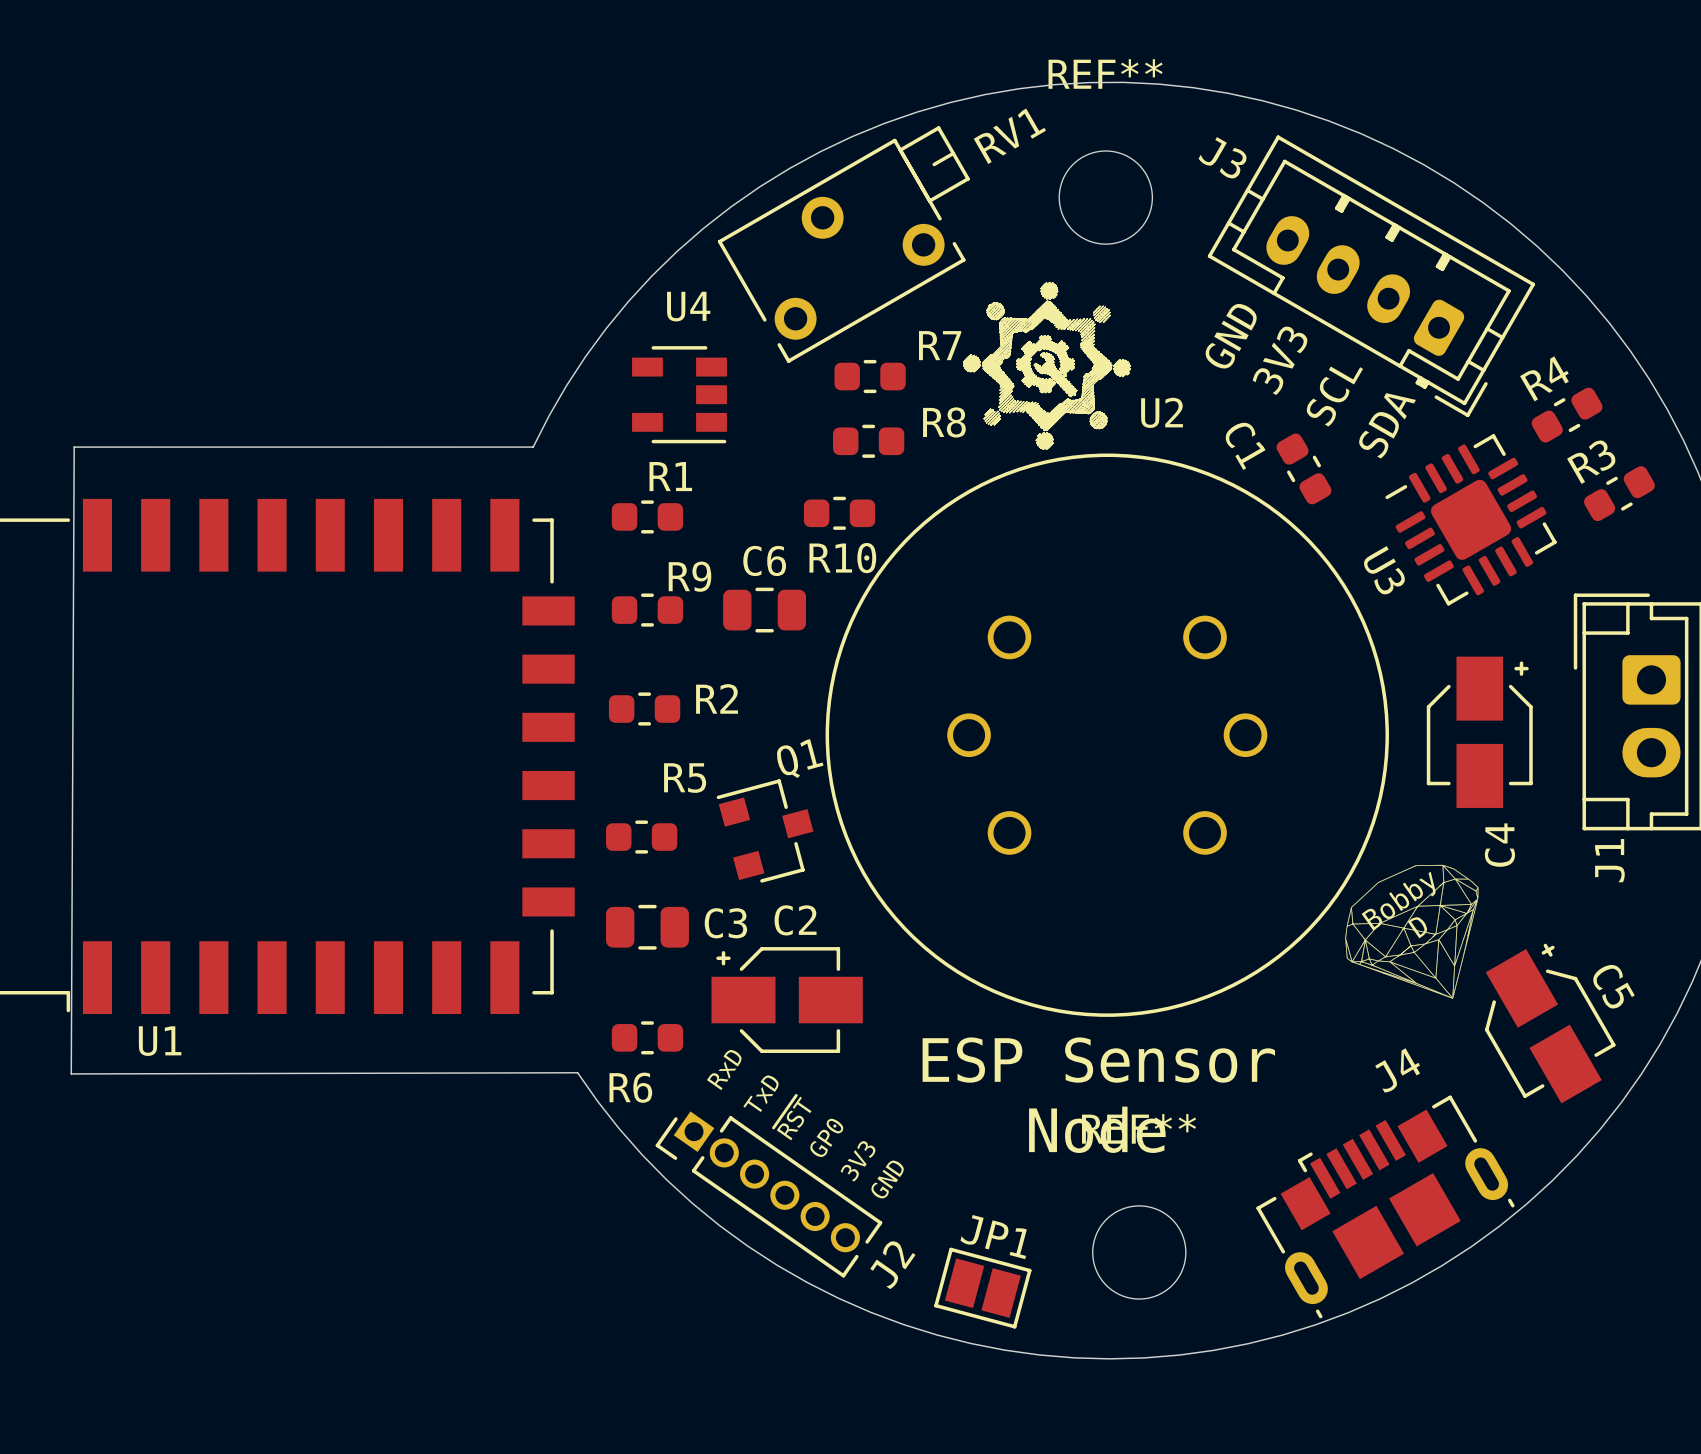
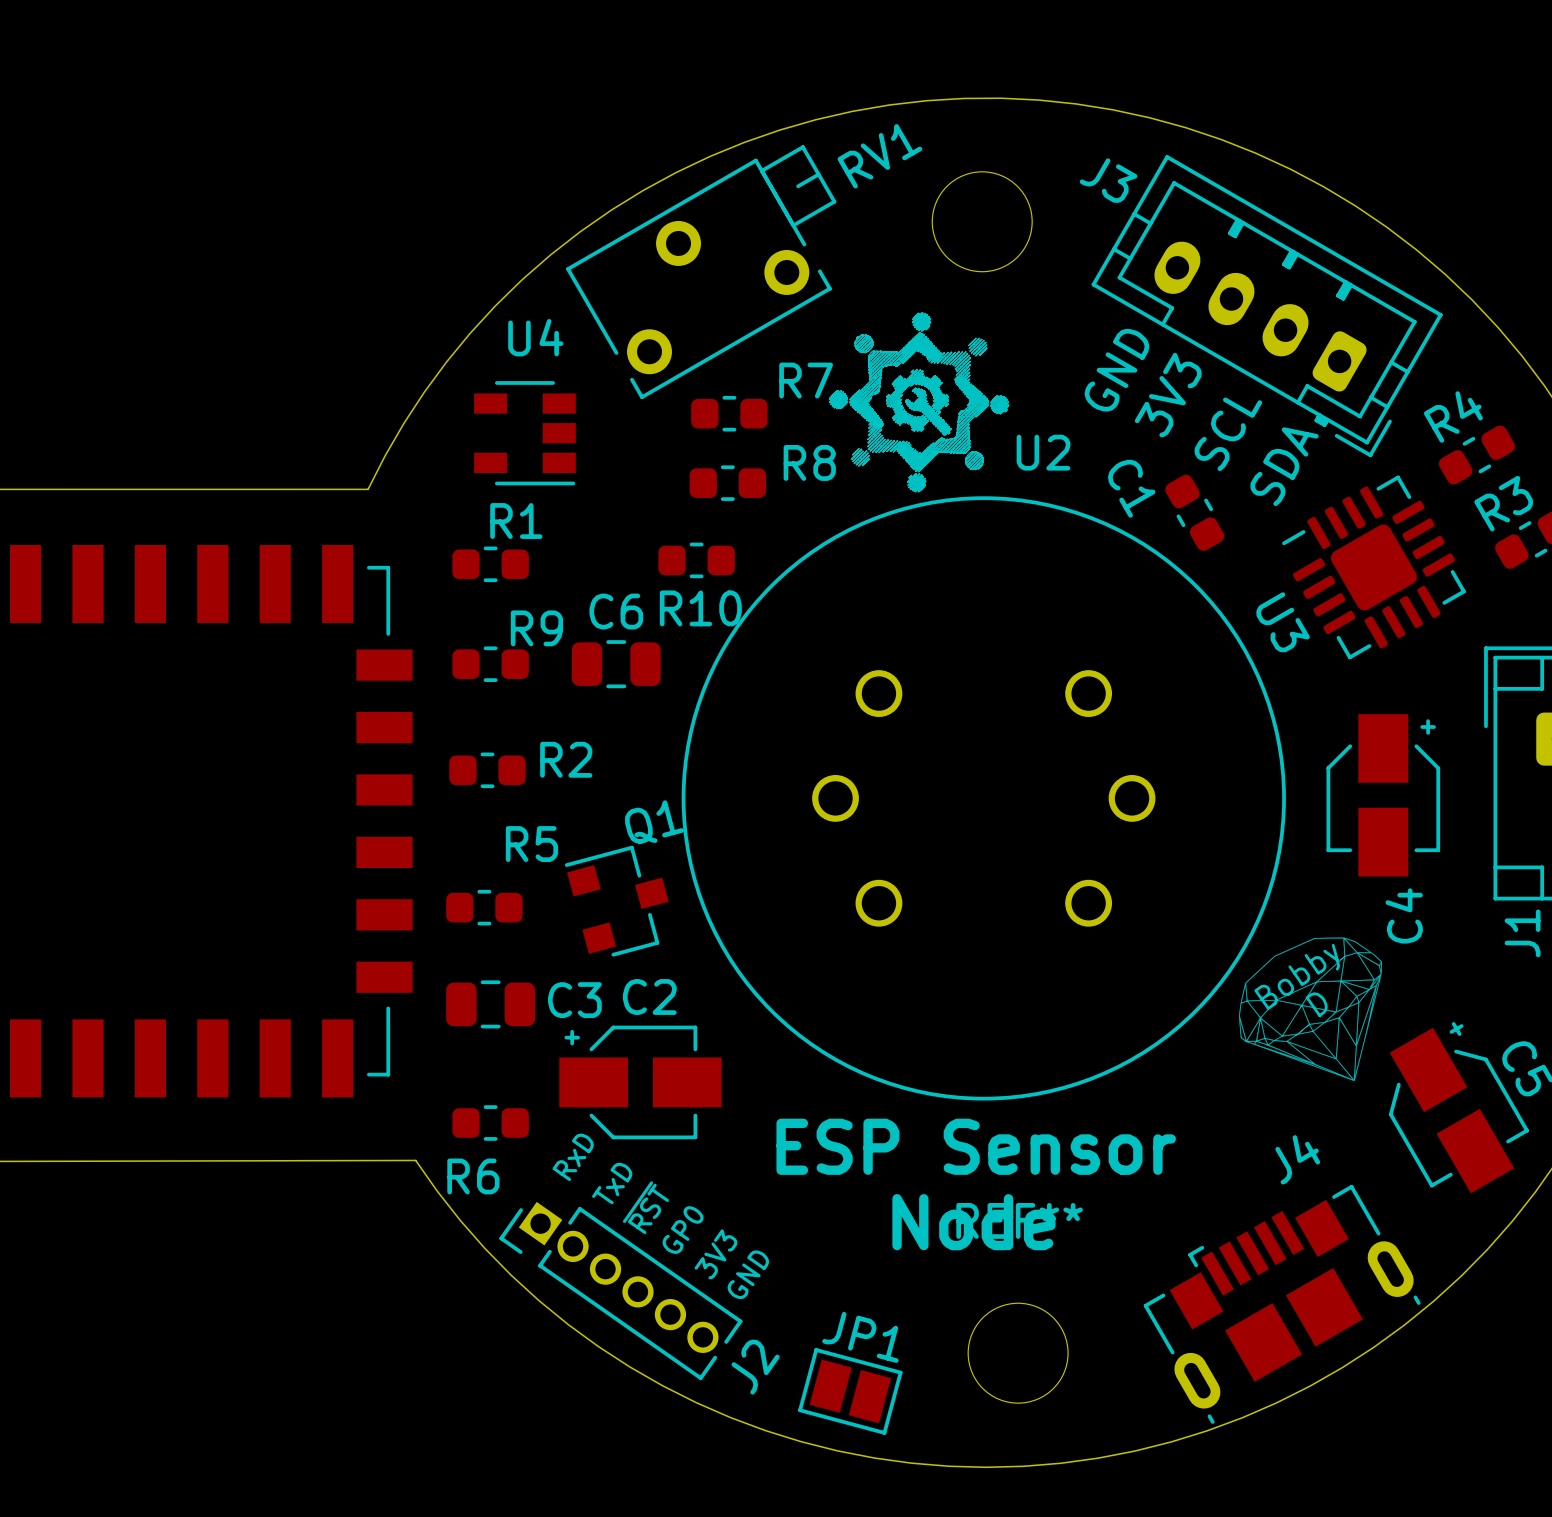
REF** name: REF** (1105, 73) -> none

